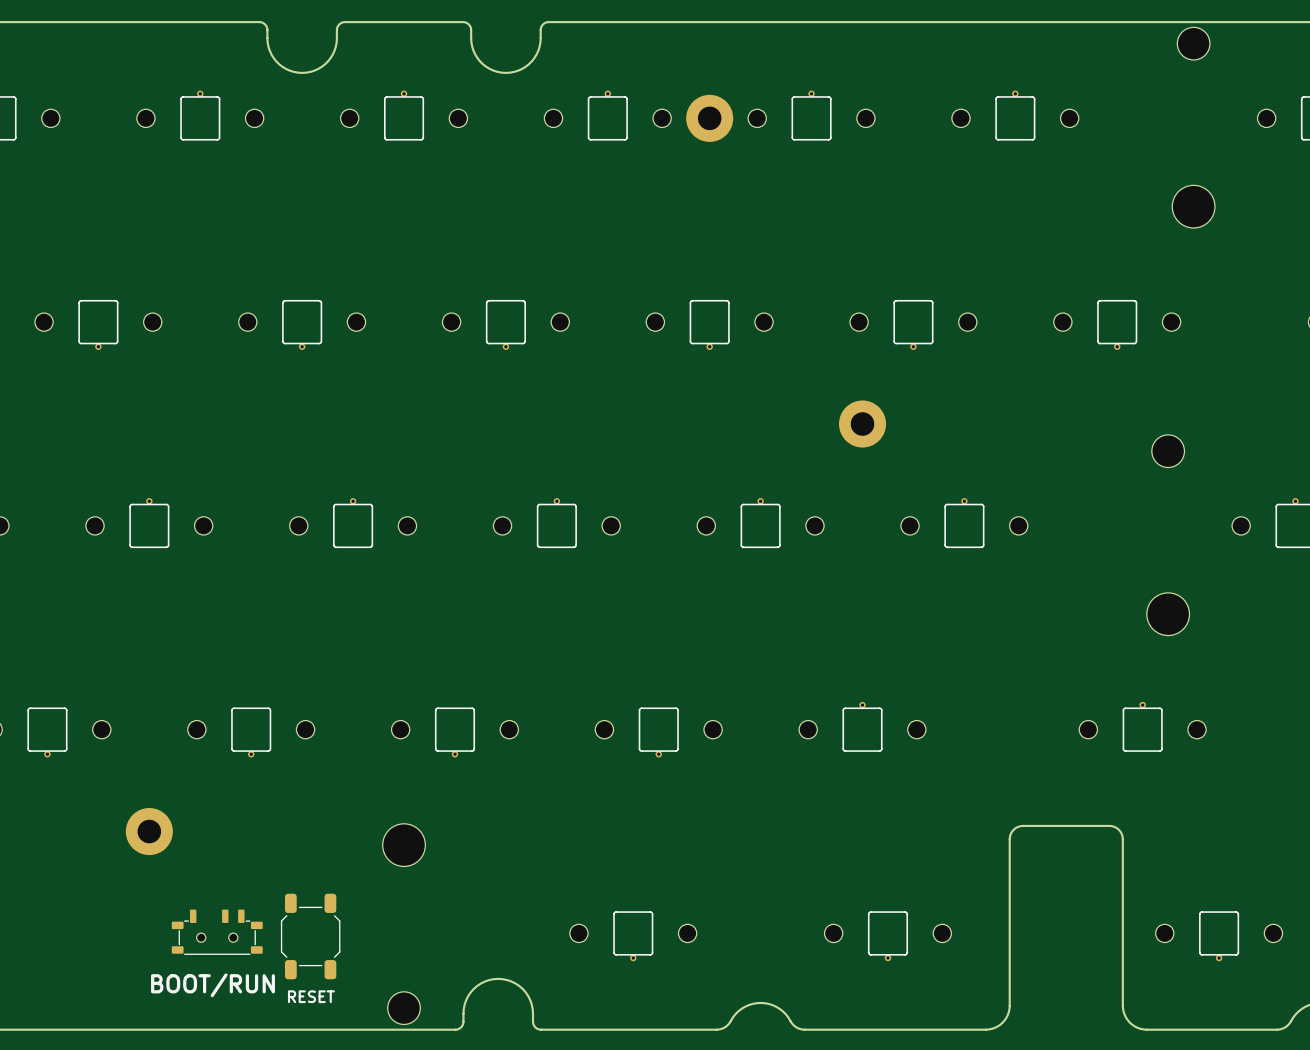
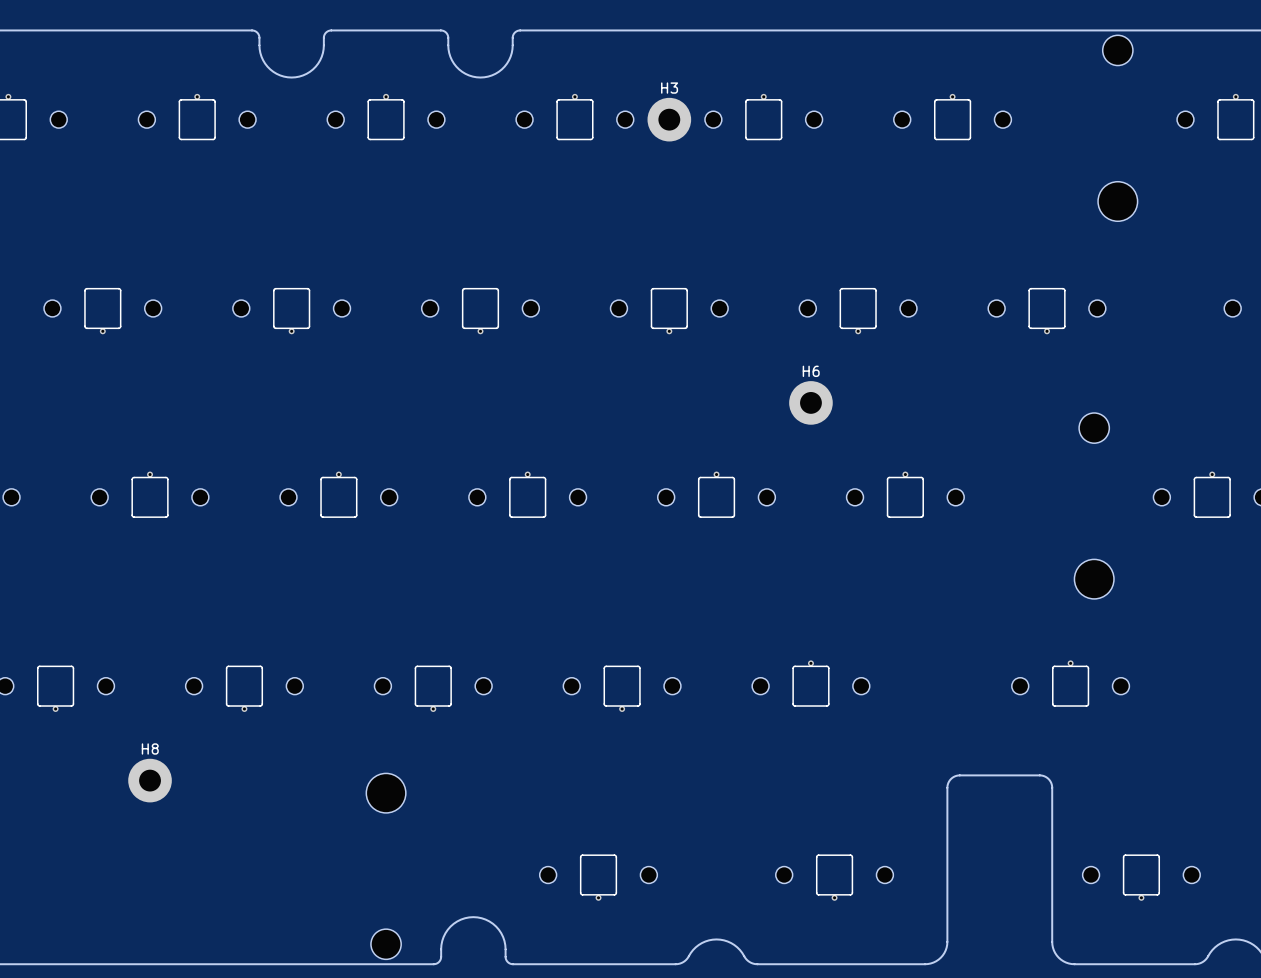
H3 name: none -> H3 (669, 88)
H6 name: none -> H6 (811, 371)
H8 name: none -> H8 (150, 748)
BOOT/RUN: (217, 932) -> none
RESET: (310, 936) -> none

